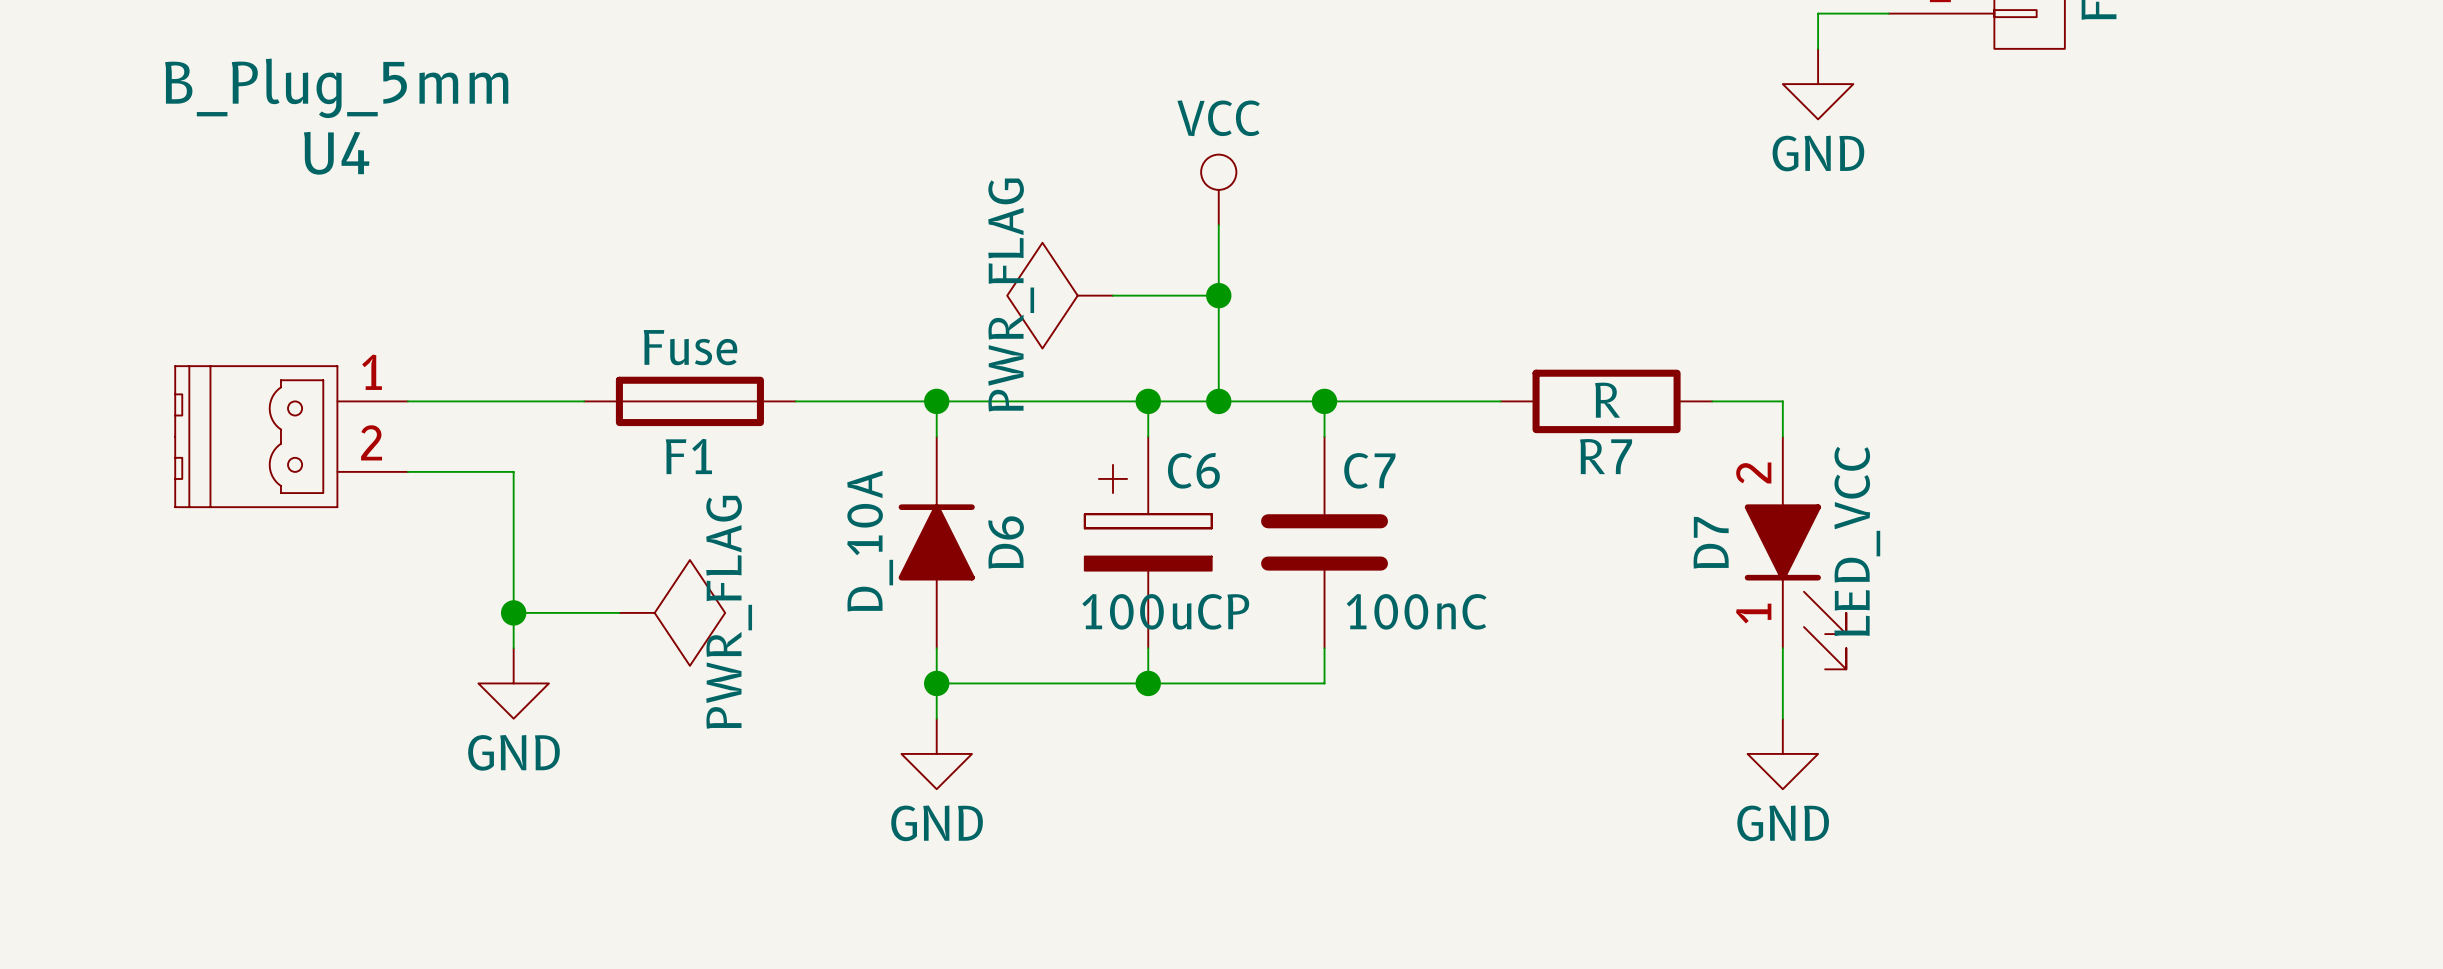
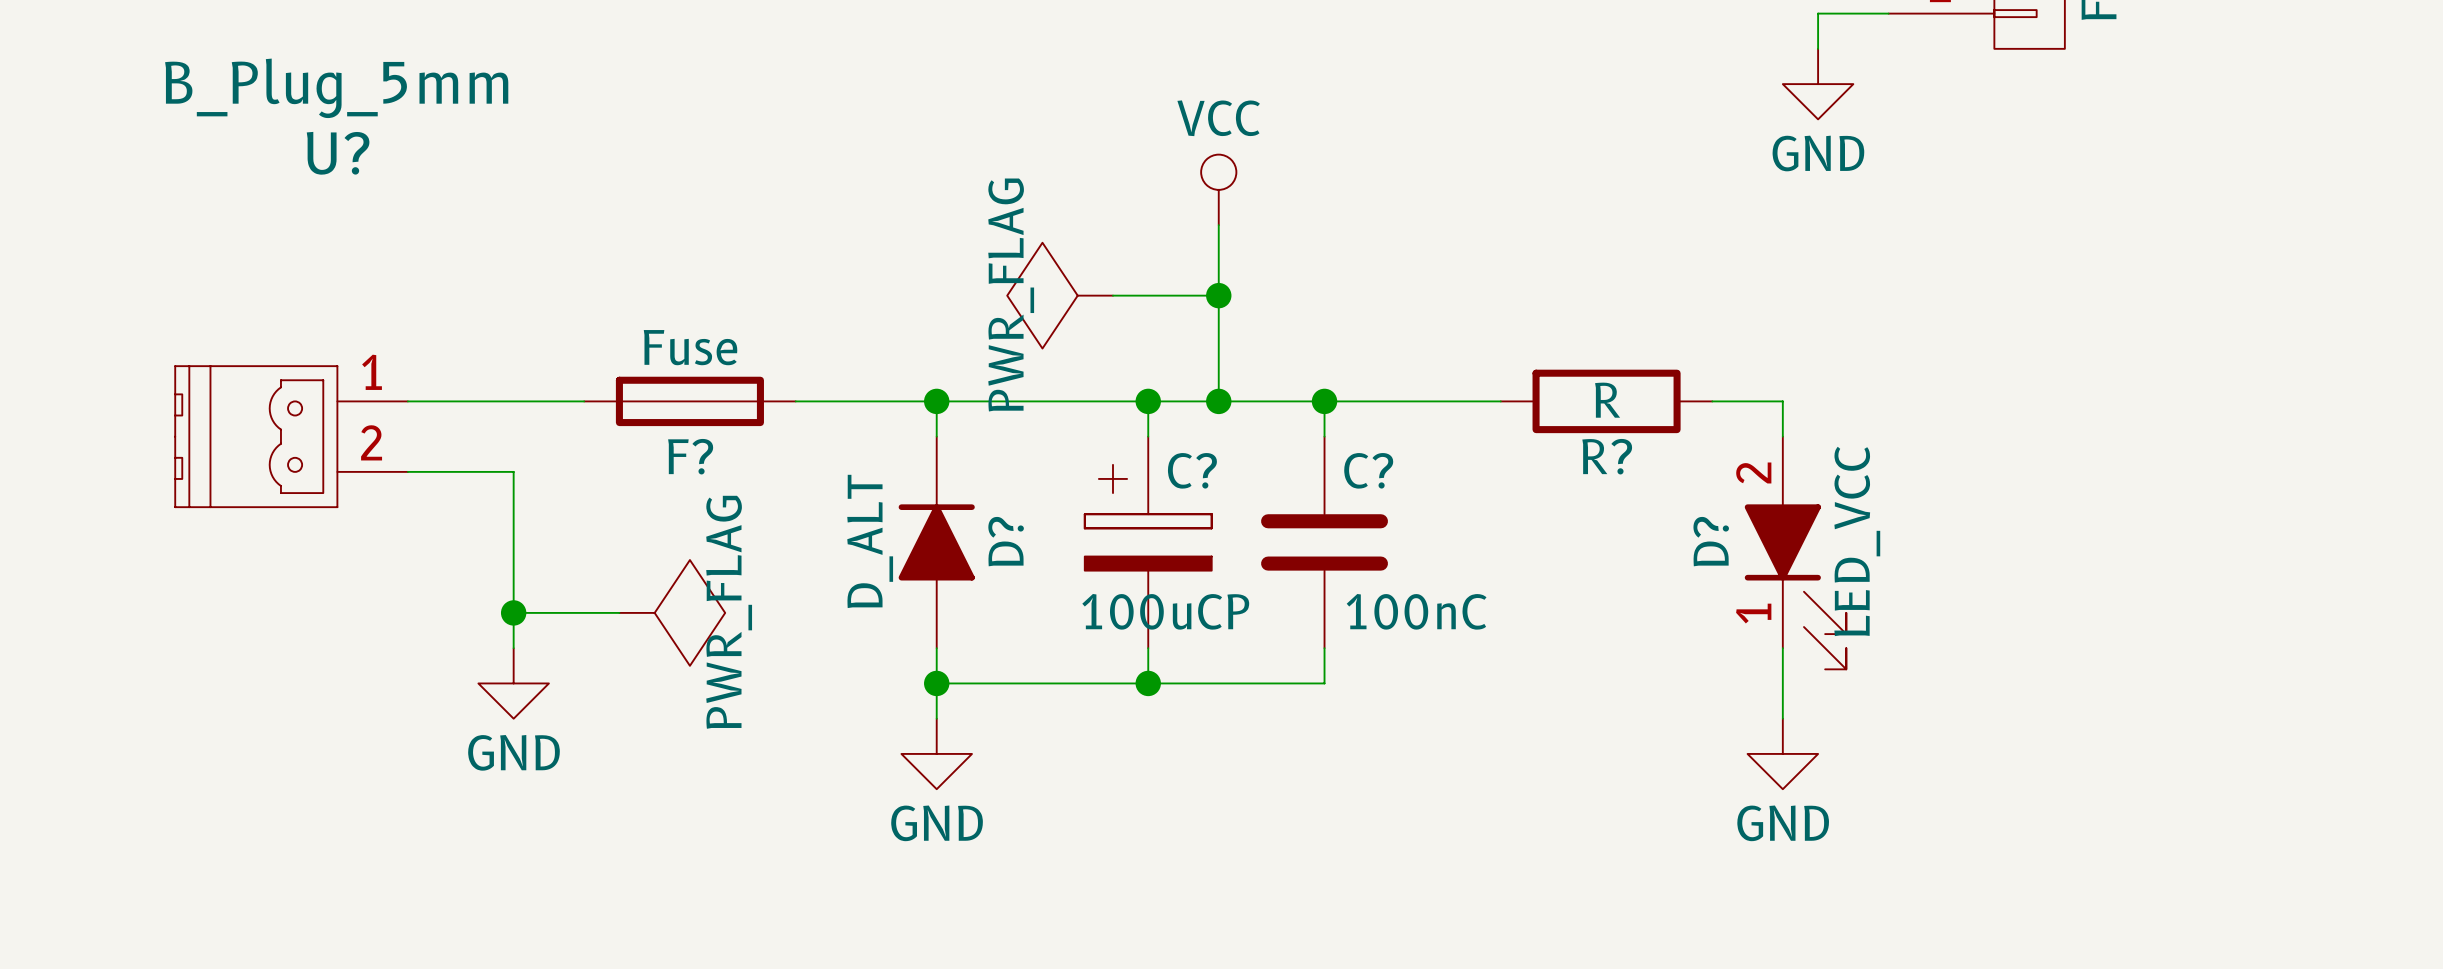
U4 name: U4 (336, 153) -> U? (338, 153)
F1 name: F1 (688, 456) -> F? (690, 456)
R7 name: R7 (1606, 456) -> R? (1607, 456)
C6 name: C6 (1193, 470) -> C? (1192, 470)
C7 name: C7 (1369, 470) -> C? (1368, 470)
D6 value: D_10A (870, 541) -> D_ALT (870, 541)
D6 name: D6 (1006, 542) -> D? (1006, 541)
D7 name: D7 (1711, 542) -> D? (1711, 541)

